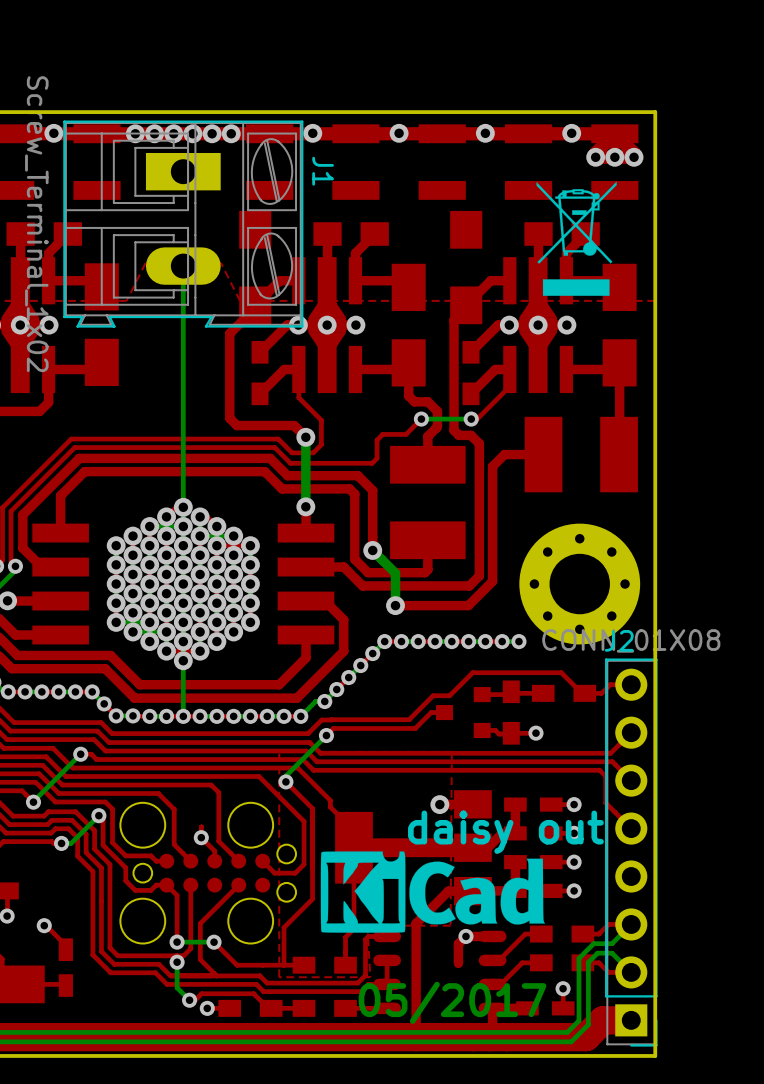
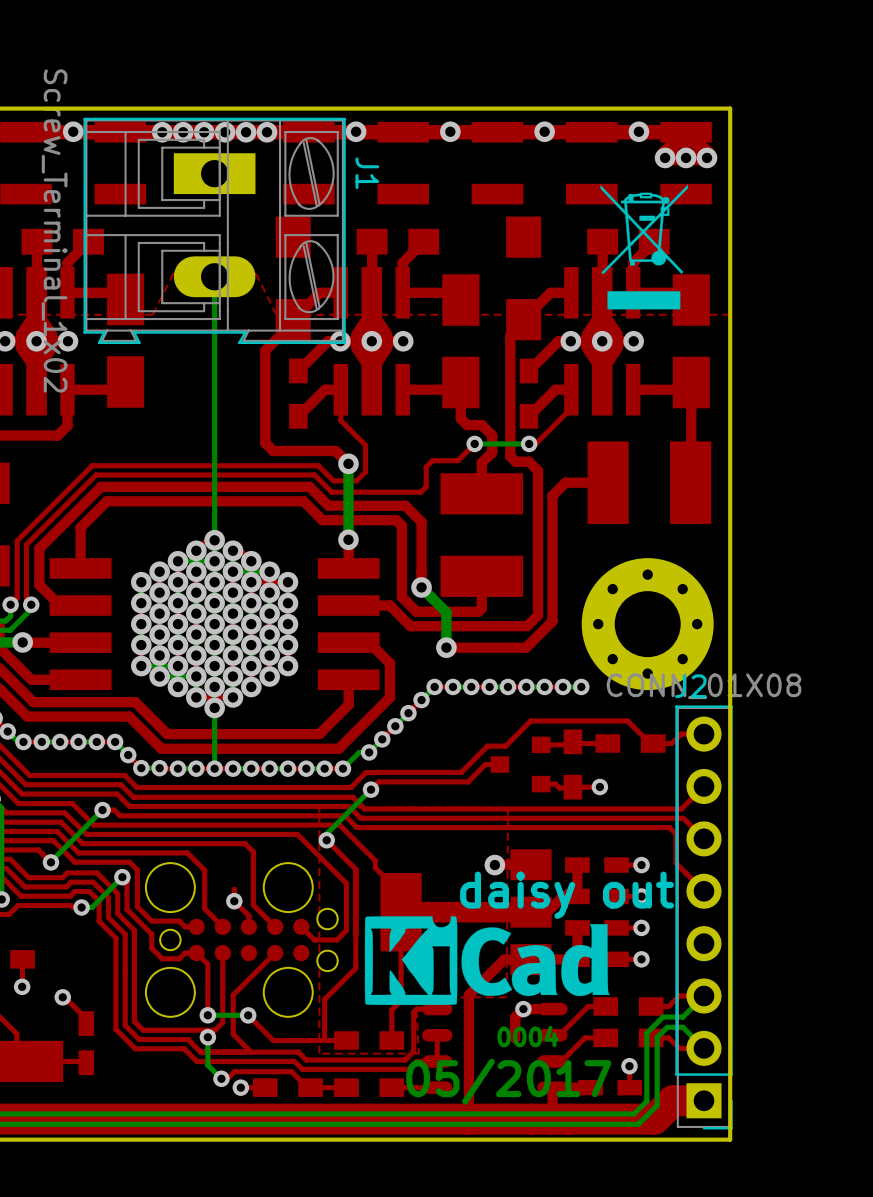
text: none -> 0004 (528, 1036)

